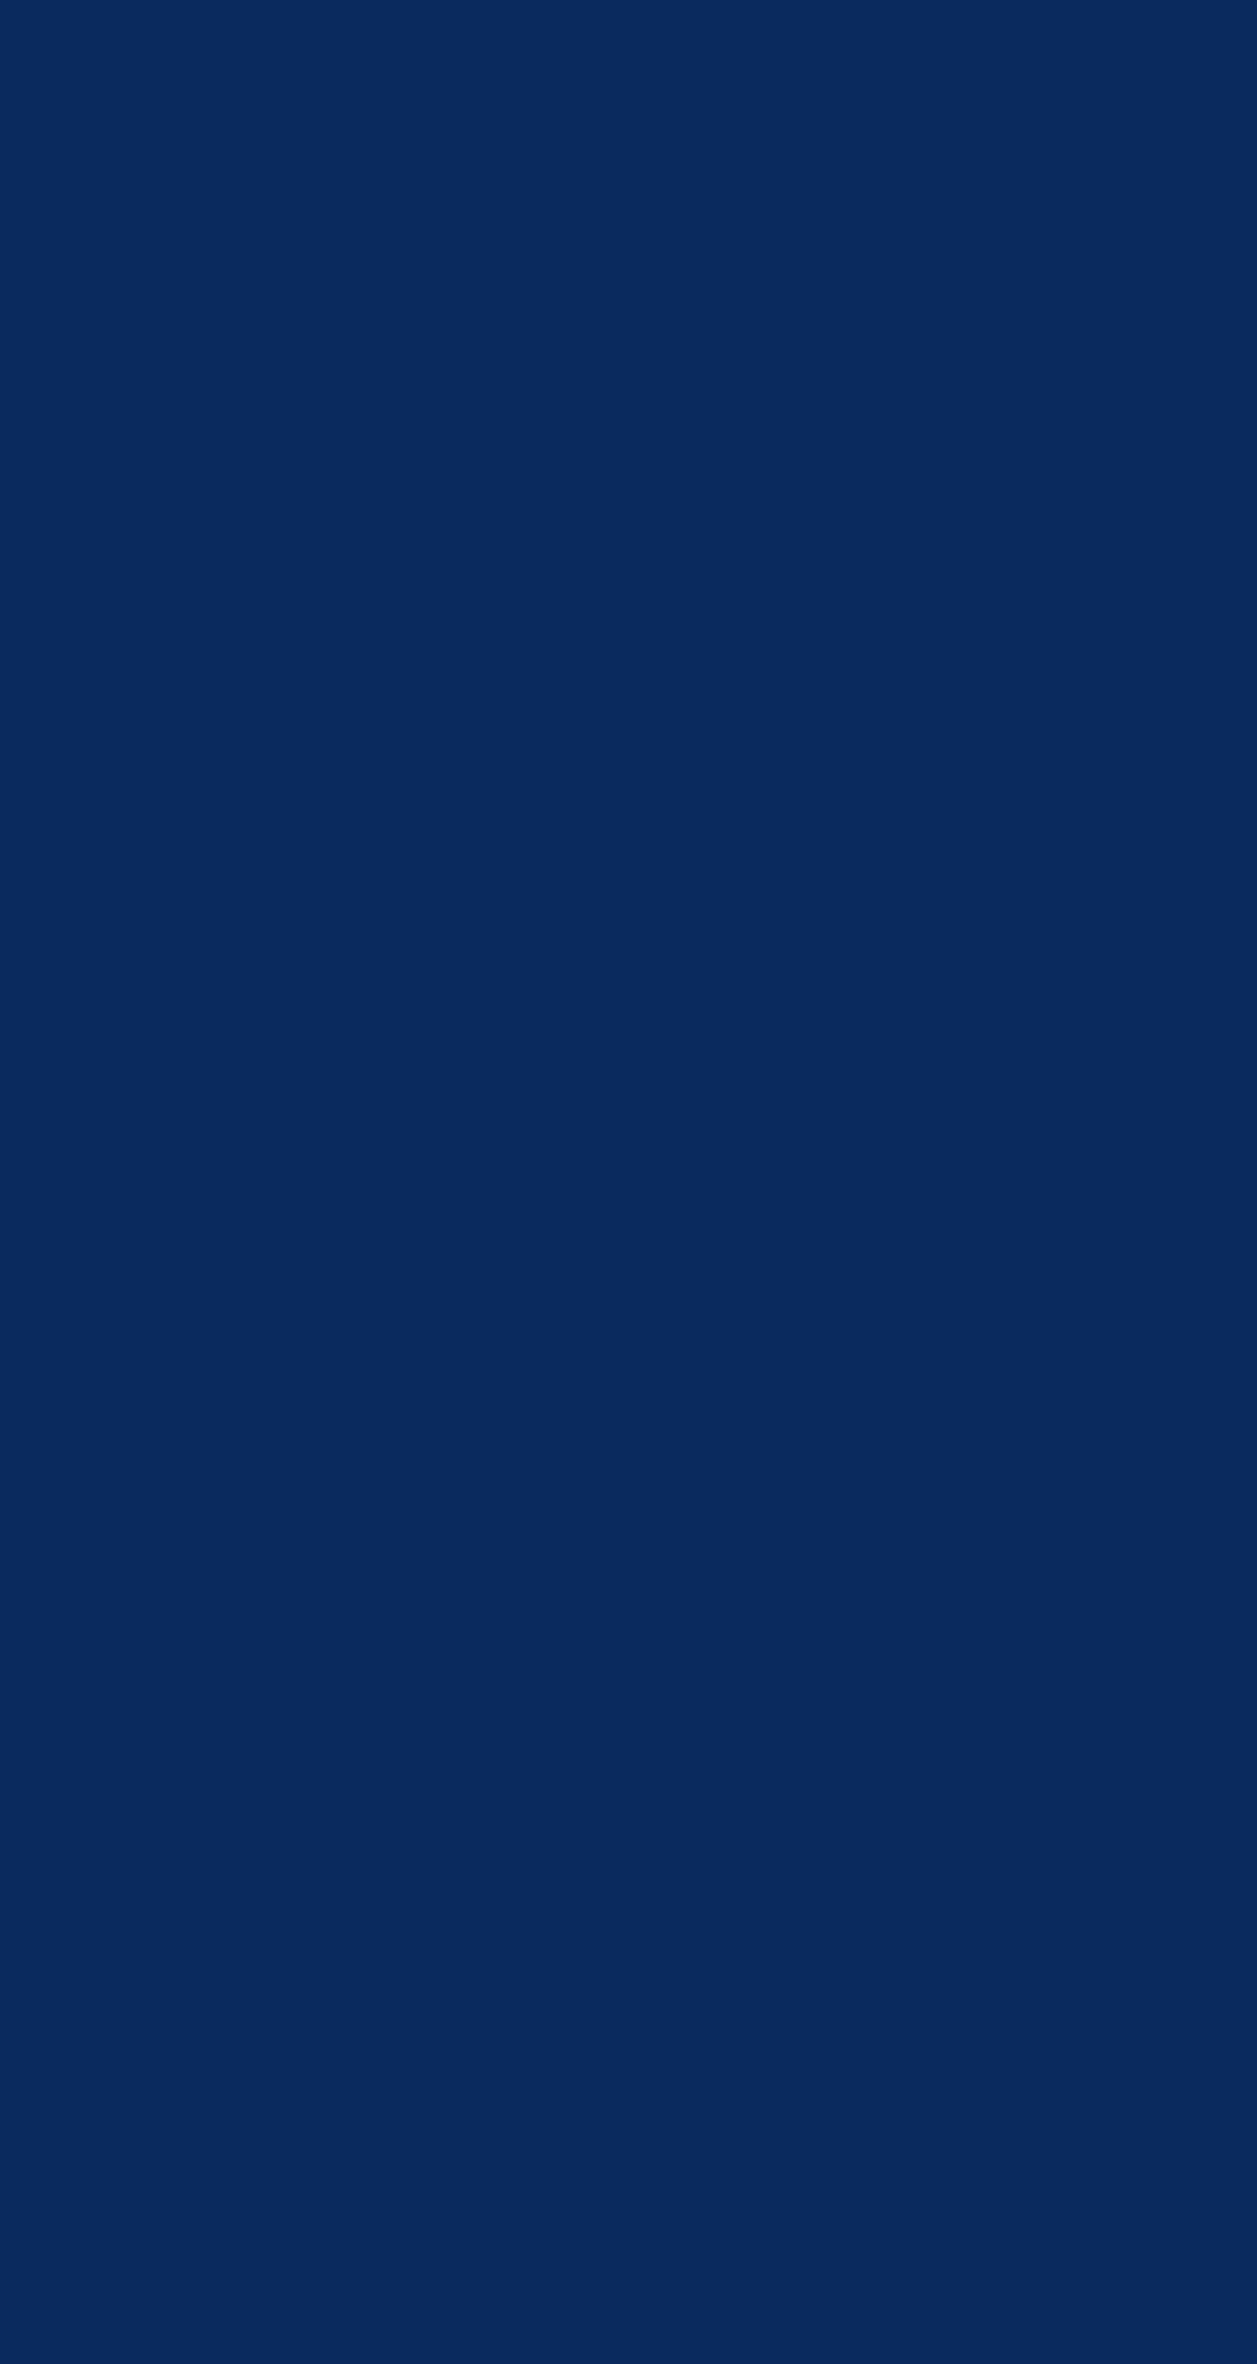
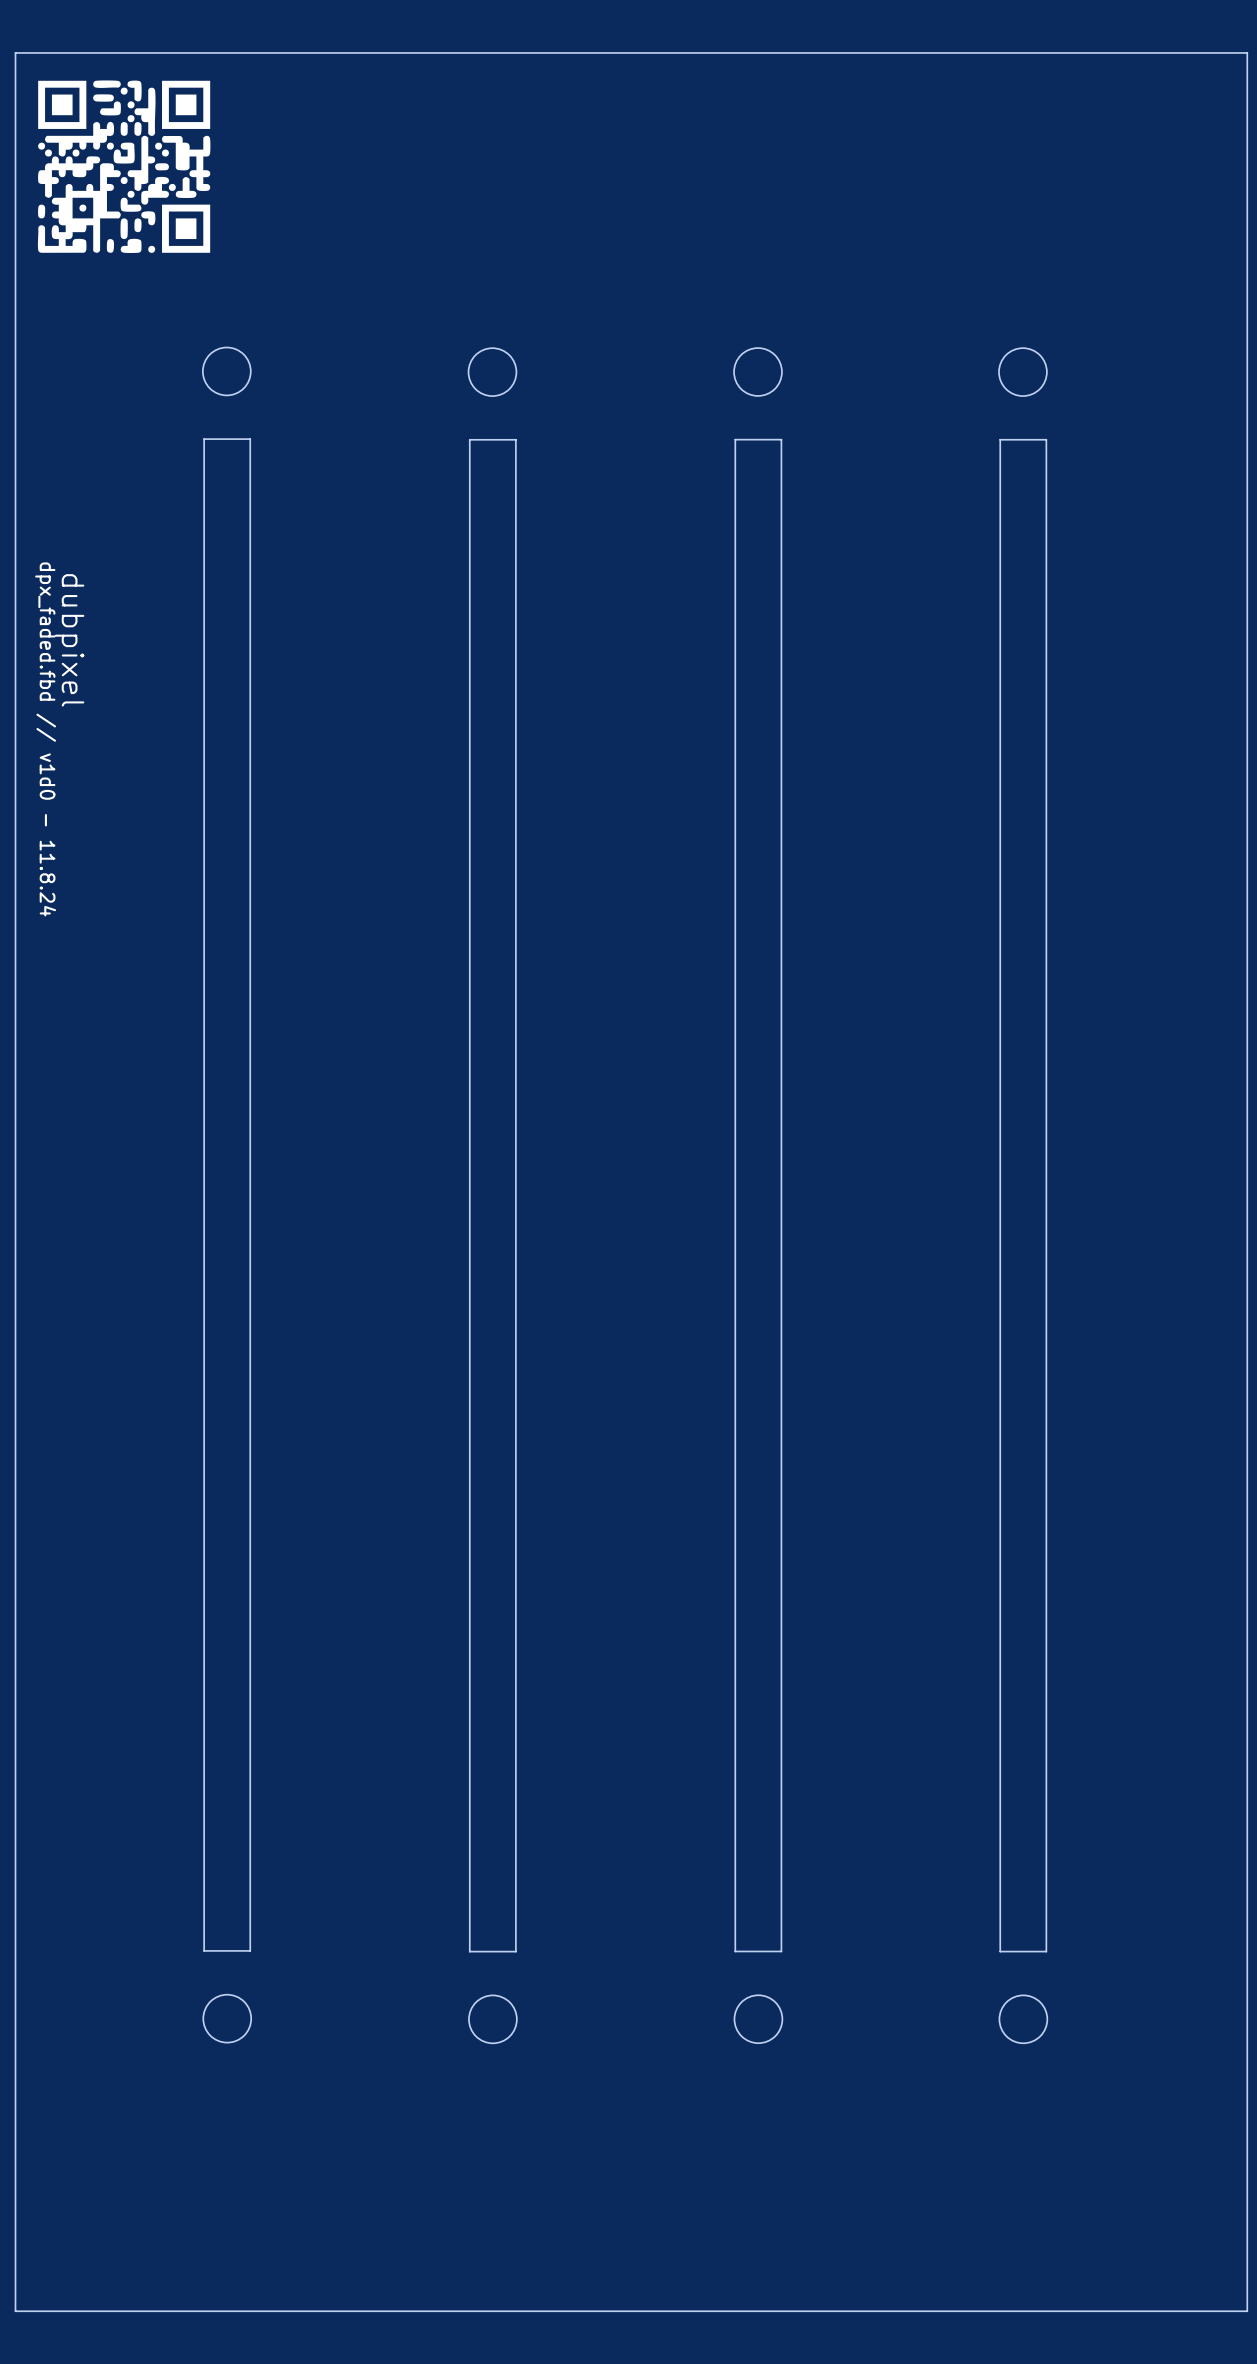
board edge: none -> (1247, 52) (15, 52) (15, 2311) (1247, 2311) (1247, 52)
drawing: none -> [37, 80, 211, 253]
round board edge: none -> [202, 347, 252, 396]
round board edge: none -> [468, 347, 517, 397]
round board edge: none -> [733, 347, 783, 397]
round board edge: none -> [998, 347, 1048, 397]
board edge: none -> (250, 439) (204, 439) (204, 1950) (250, 1950) (250, 439)
board edge: none -> (515, 439) (469, 439) (469, 1951) (515, 1951) (515, 439)
board edge: none -> (781, 439) (735, 439) (735, 1951) (781, 1951) (781, 439)
board edge: none -> (1046, 439) (1000, 439) (1000, 1951) (1046, 1951) (1046, 439)
text: none -> dubpixel (69, 640)
text: none -> dpx_faded.fbd // v1d0 - 11.8.24 (45, 739)
round board edge: none -> [202, 1994, 252, 2043]
round board edge: none -> [734, 1994, 783, 2044]
round board edge: none -> [468, 1995, 518, 2044]
round board edge: none -> [999, 1995, 1048, 2044]

